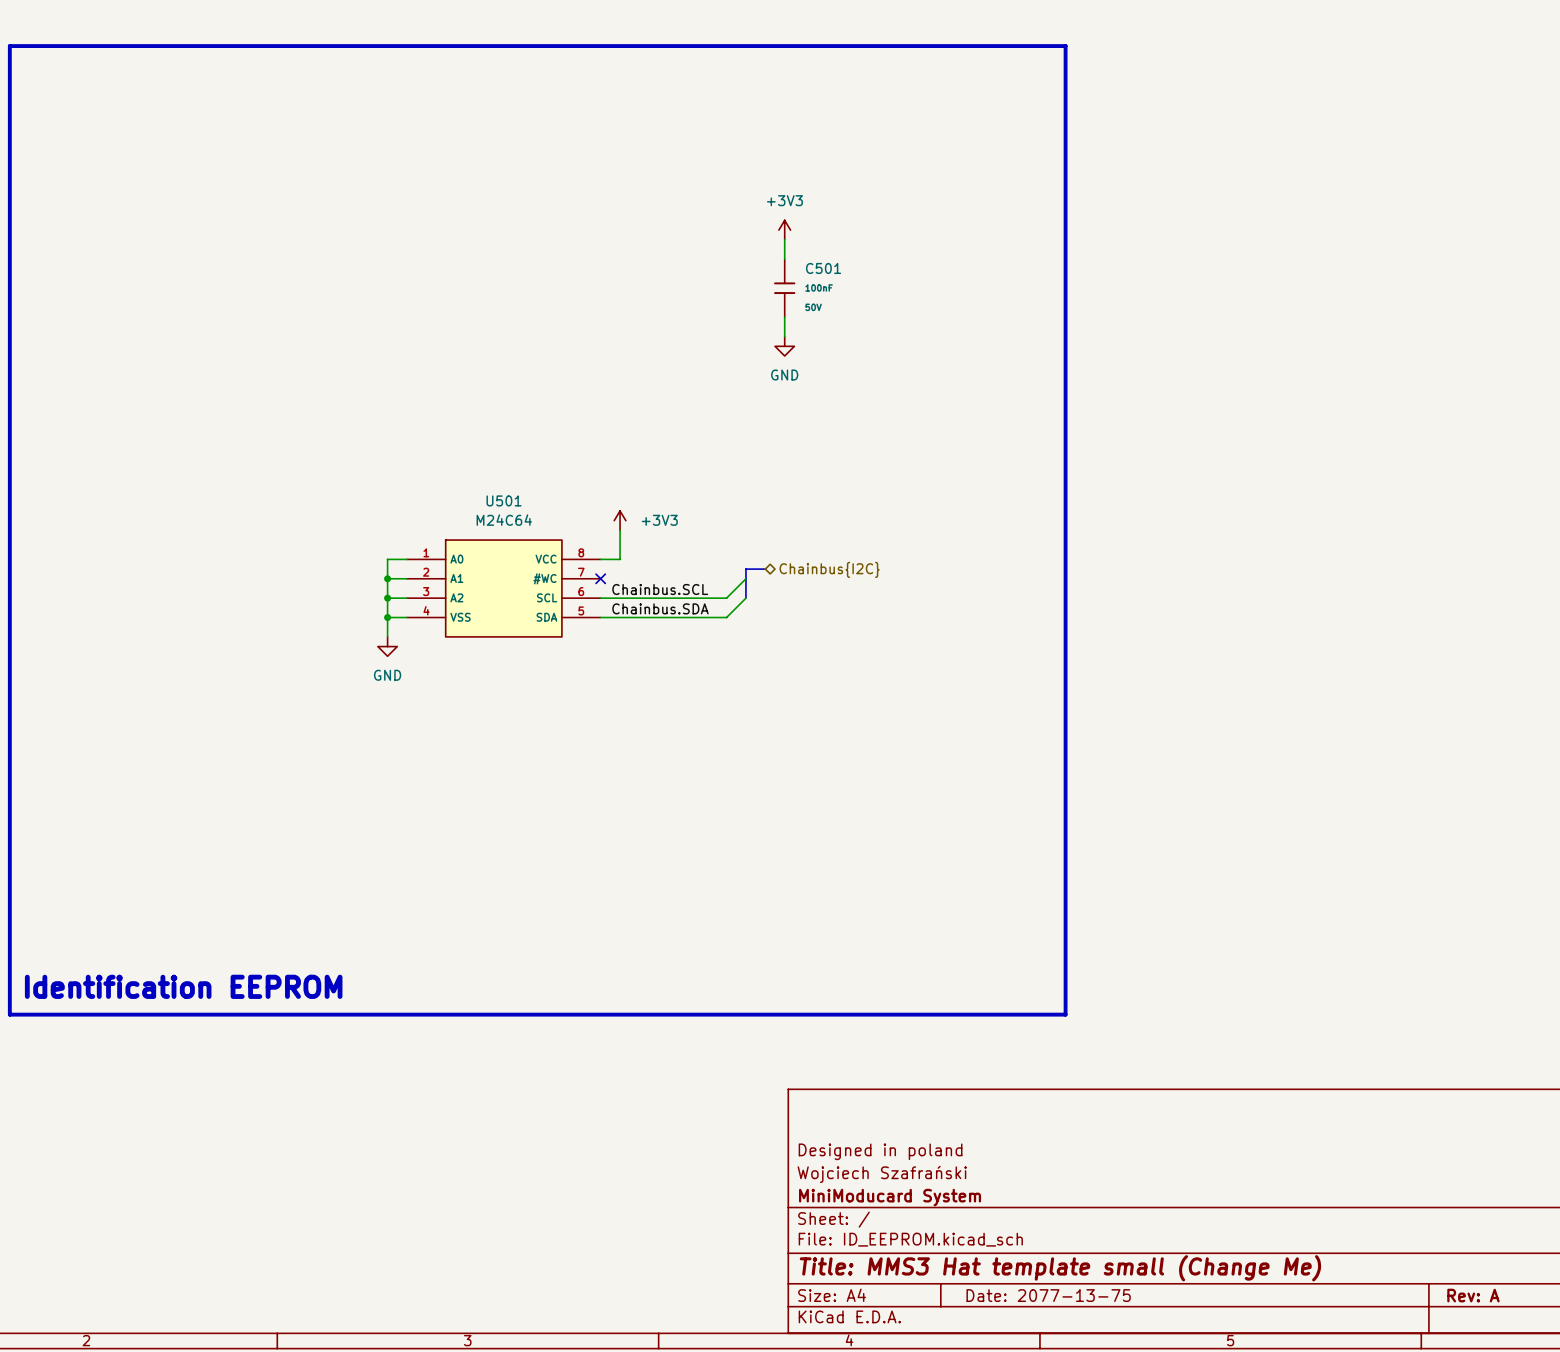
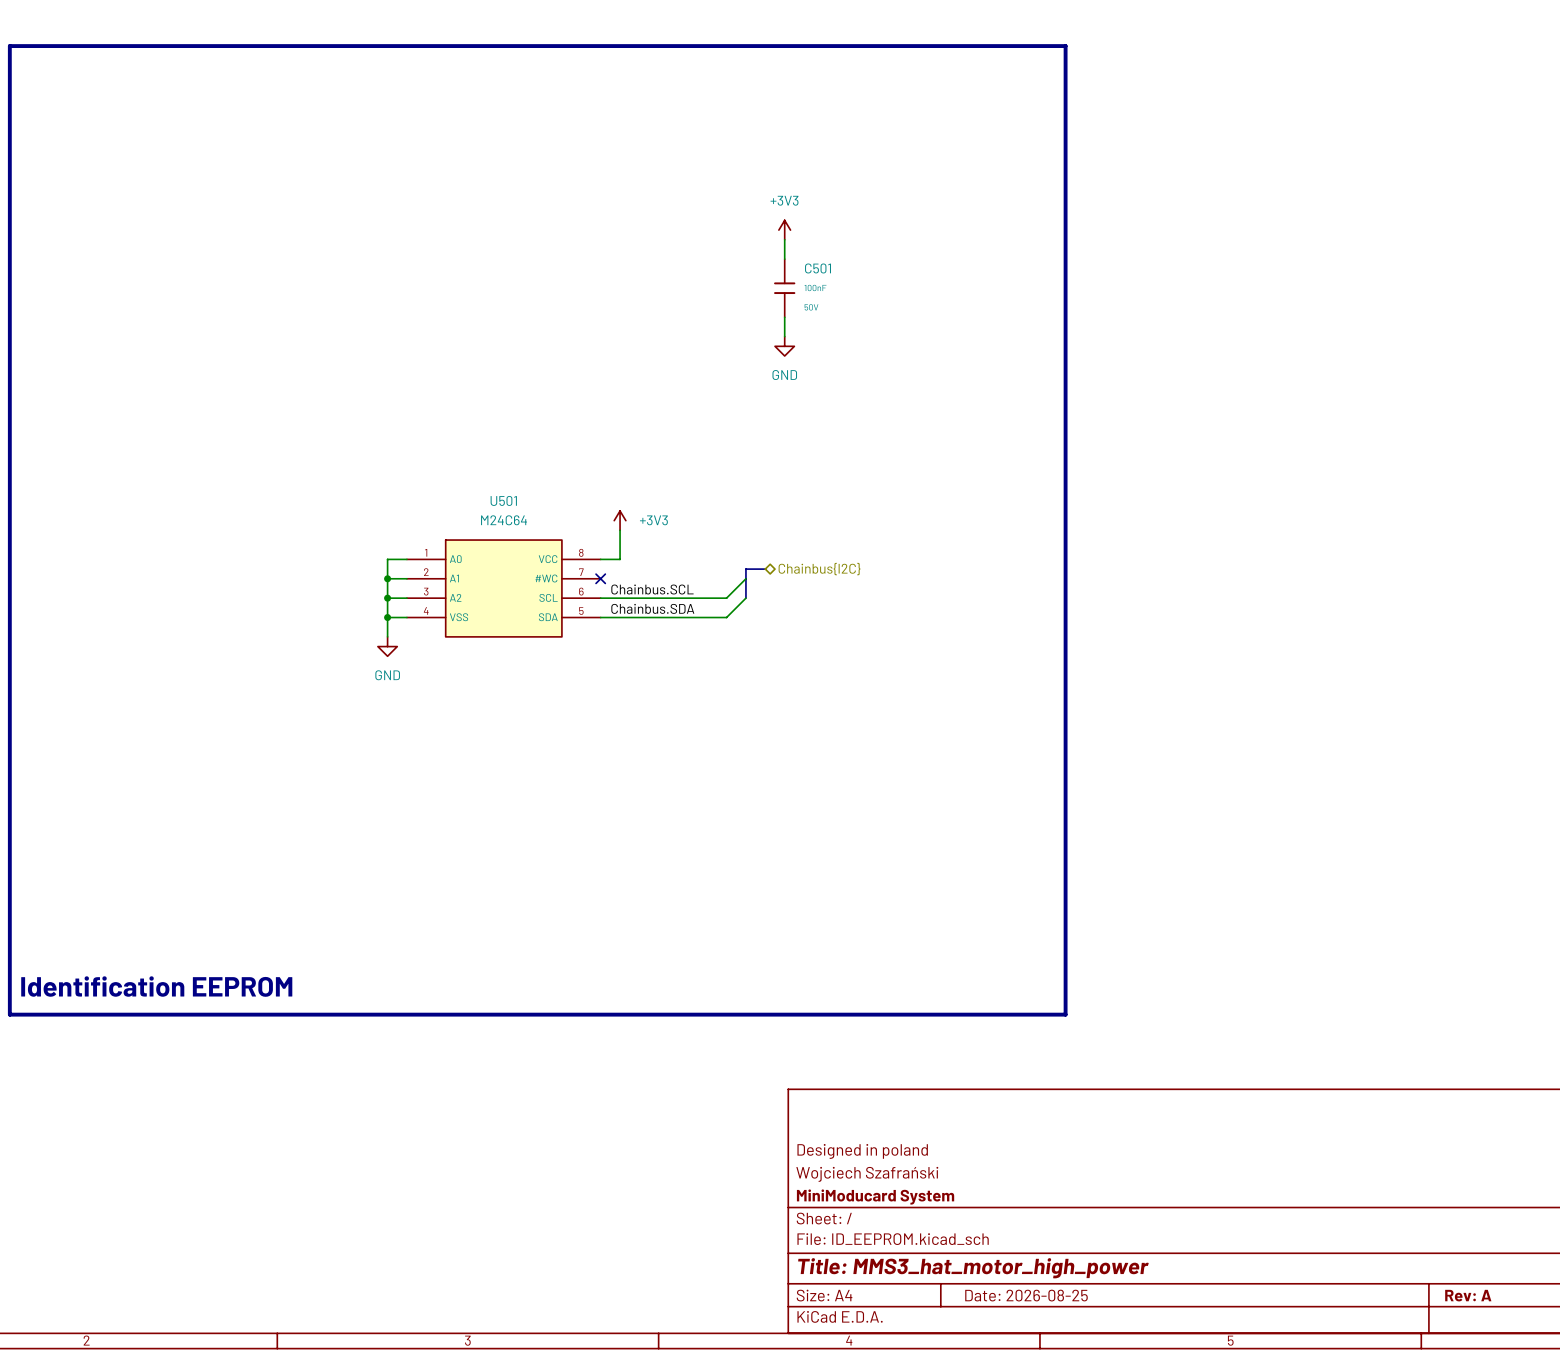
title block: Title: MMS3 Hat template small (Change Me) (1060, 1268) -> Title: MMS3_hat_motor_high_power (973, 1268)
title block: Date: 2077-13-75 (1048, 1295) -> Date: 2026-08-25 (1026, 1295)

